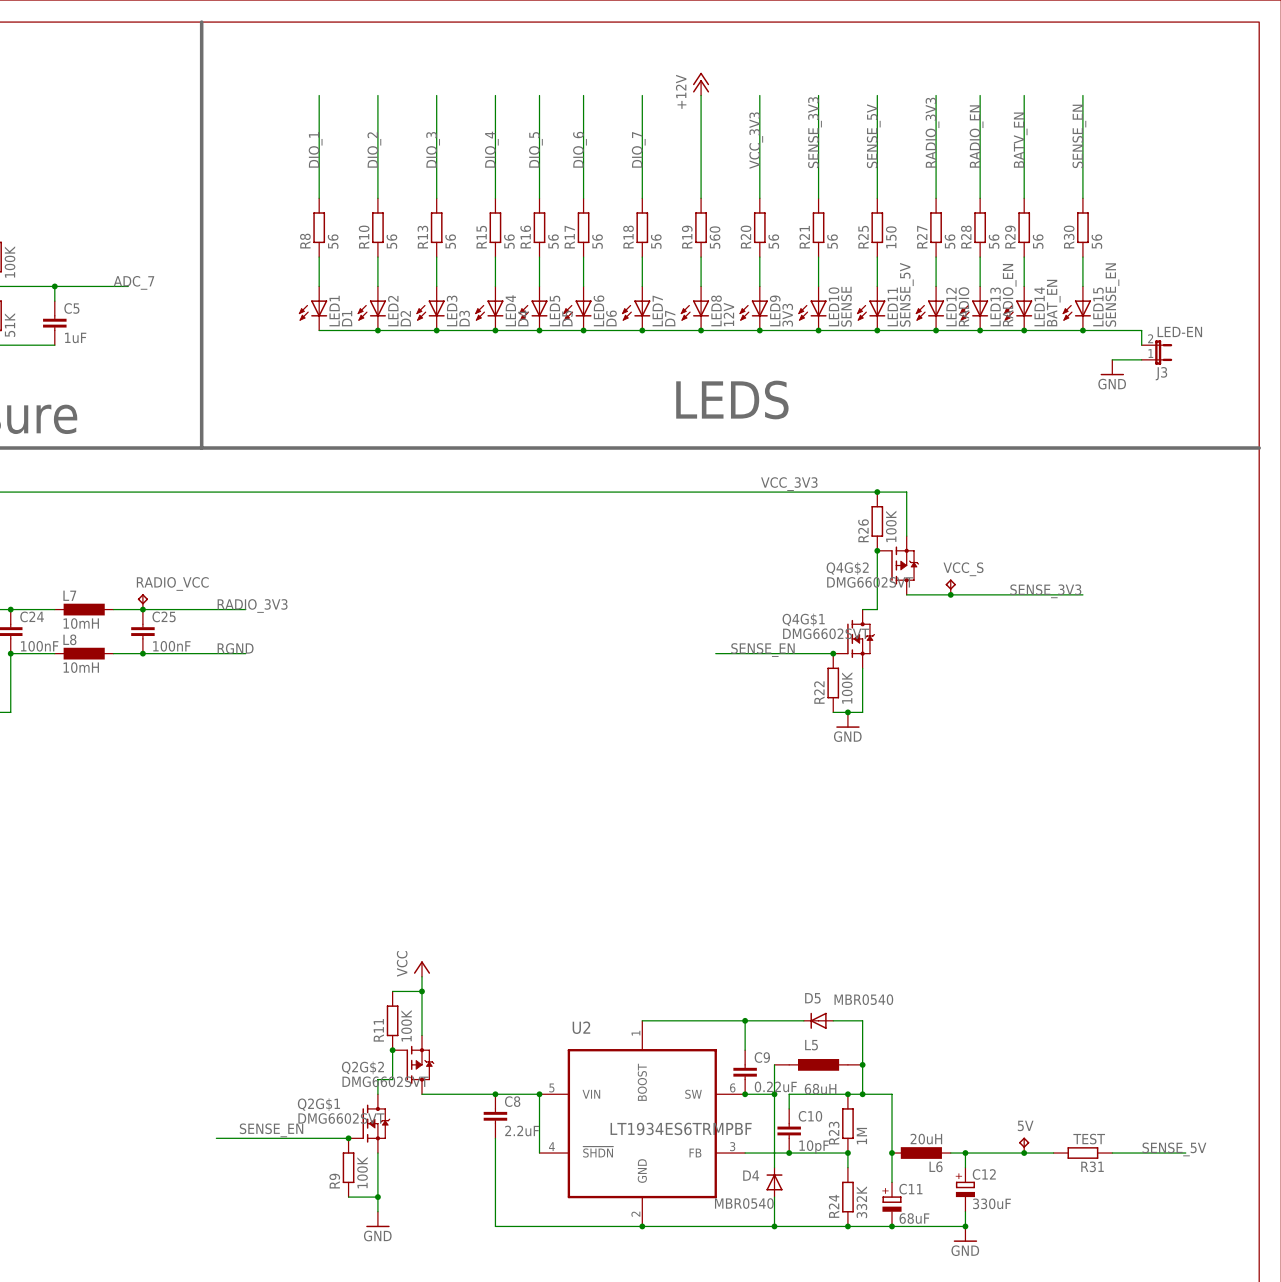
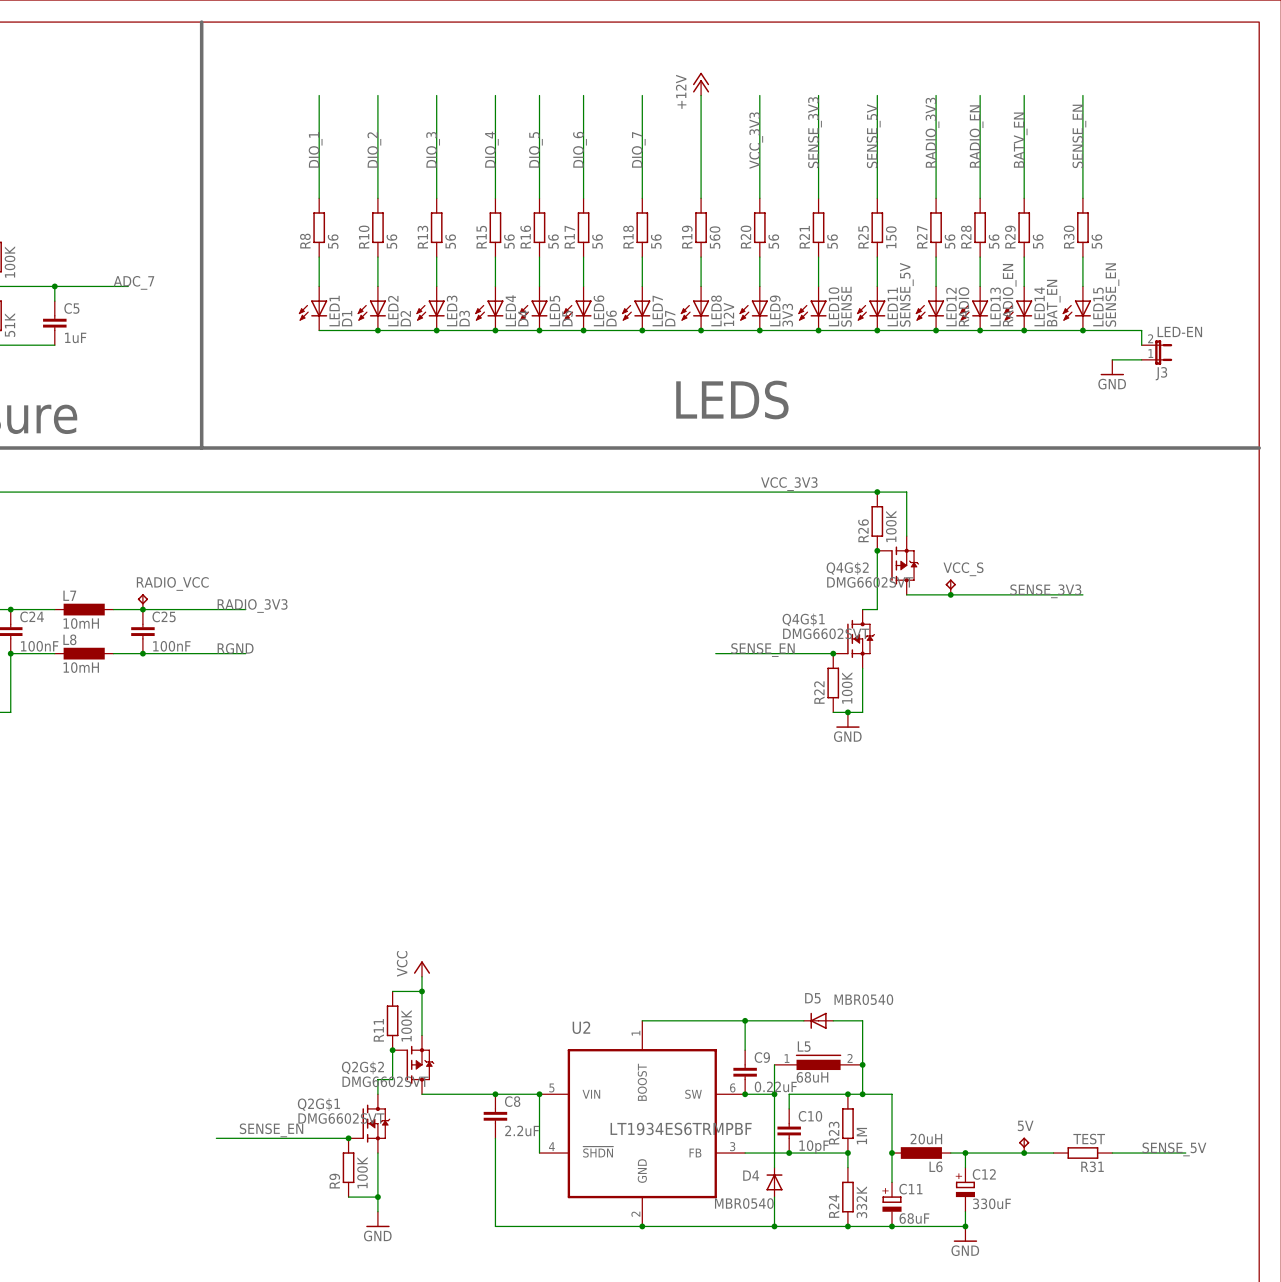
L5 symbol: [774, 1059, 863, 1071] -> [774, 1054, 863, 1071]
L5 value position: 68uH (820, 1089) -> 68uH (812, 1077)

